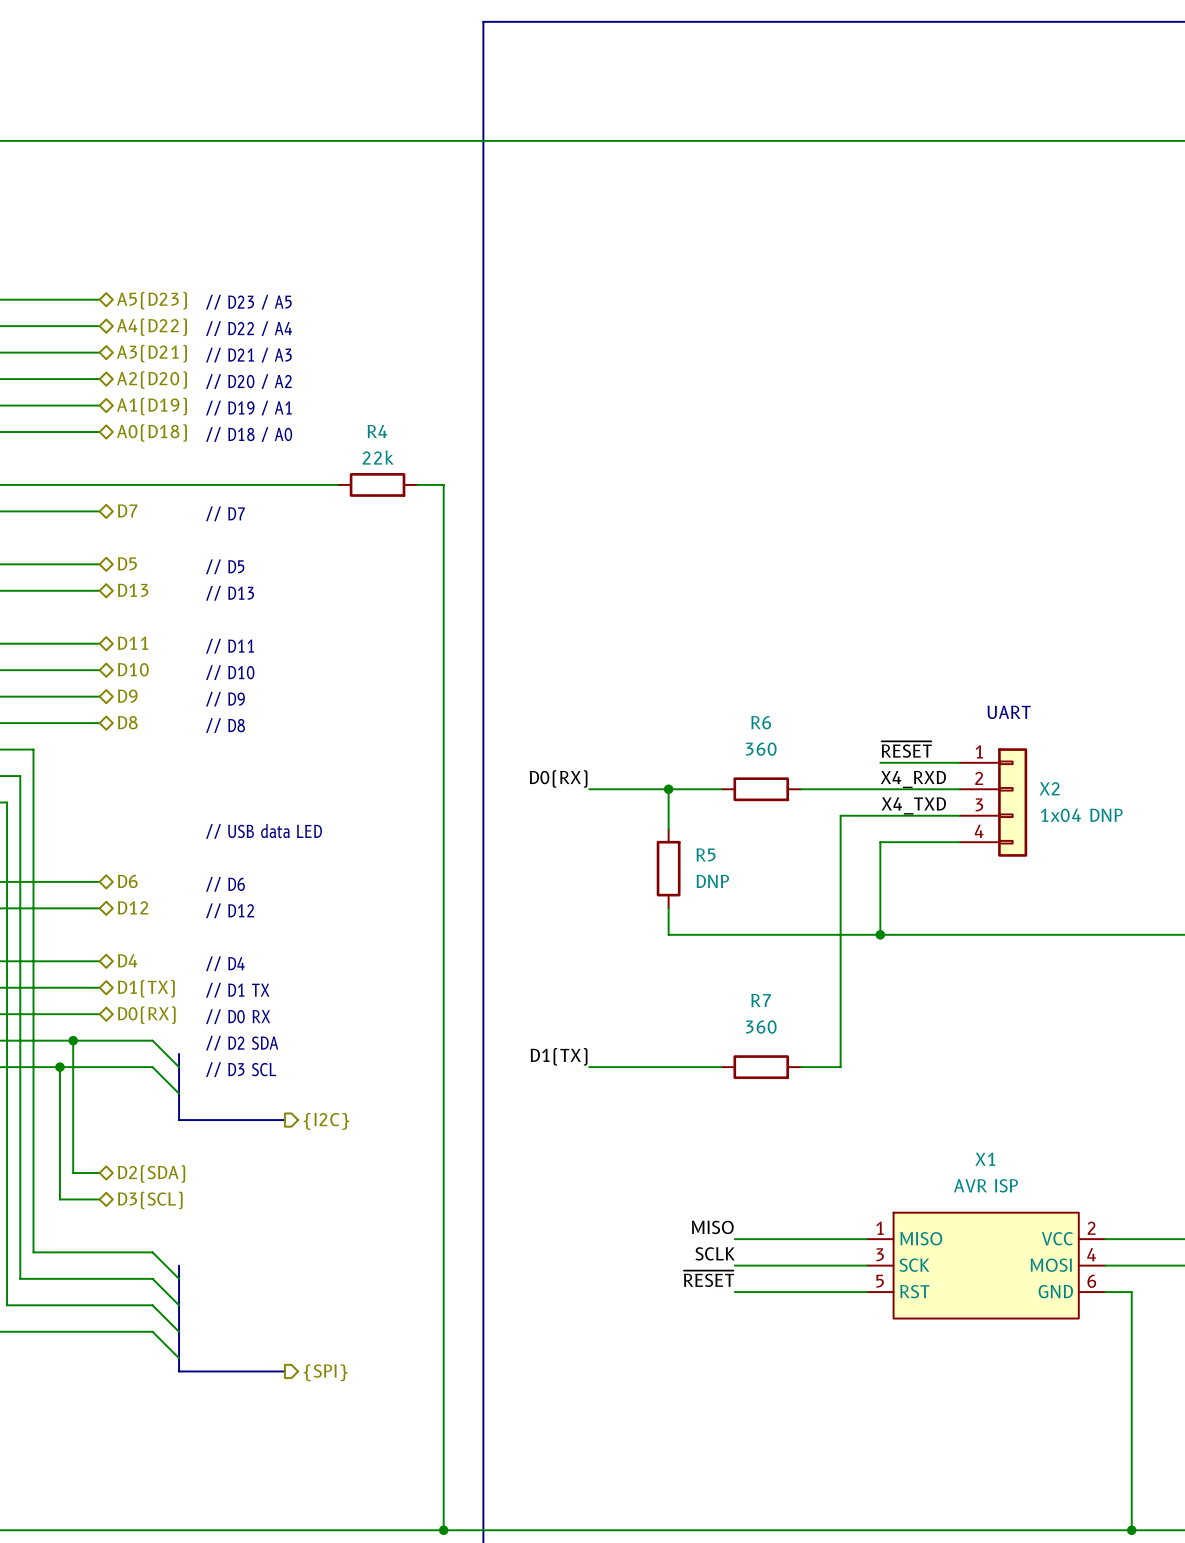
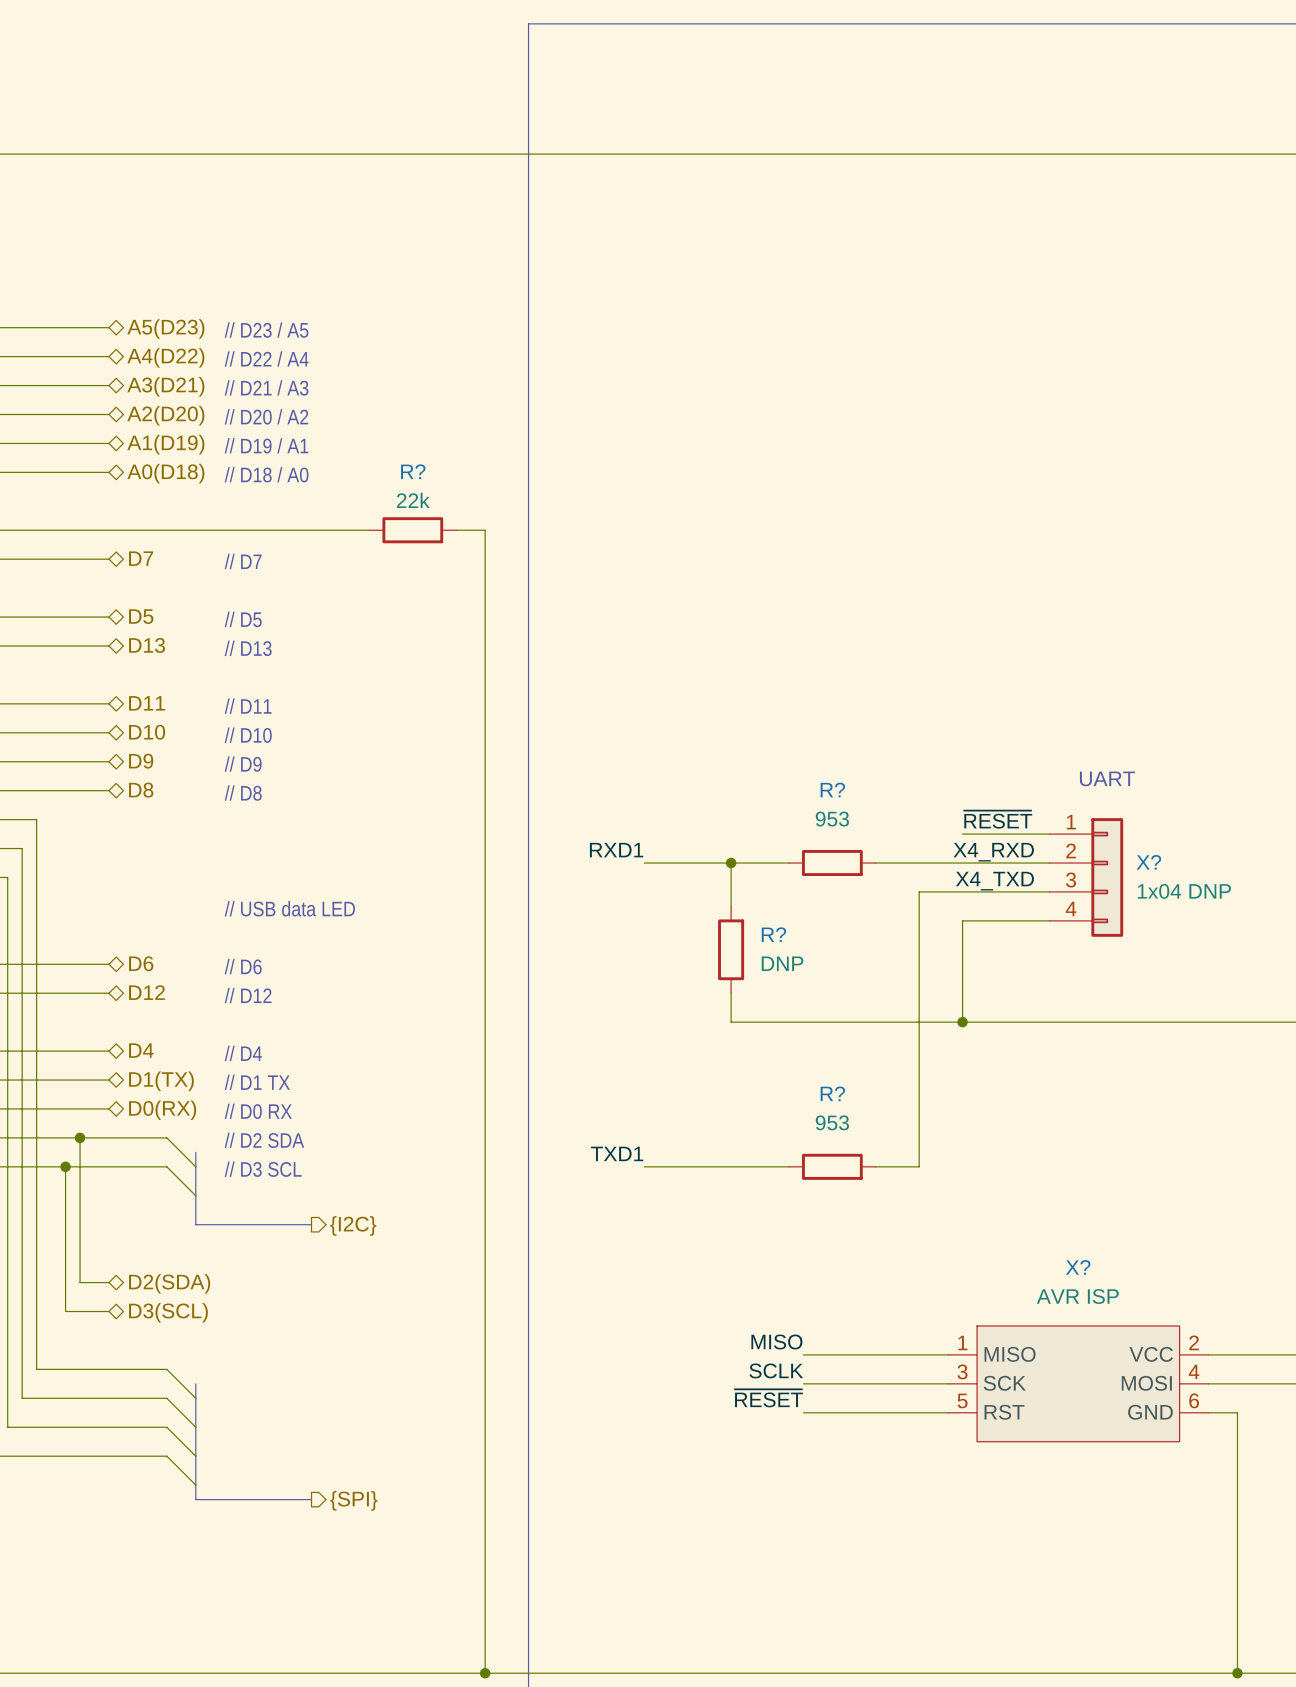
R4 name: R4 (377, 431) -> R? (413, 471)
R6 name: R6 (761, 722) -> R? (832, 790)
R6 text: 360 (761, 749) -> 953 (832, 819)
label: D0(RX) (558, 778) -> RXD1 (616, 850)
X2 name: X2 (1049, 788) -> X? (1148, 862)
R5 name: R5 (705, 854) -> R? (773, 934)
R7 name: R7 (761, 1000) -> R? (832, 1093)
R7 text: 360 (761, 1027) -> 953 (832, 1122)
label: D1(TX) (559, 1056) -> TXD1 (617, 1153)
X1 name: X1 (985, 1159) -> X? (1078, 1267)

